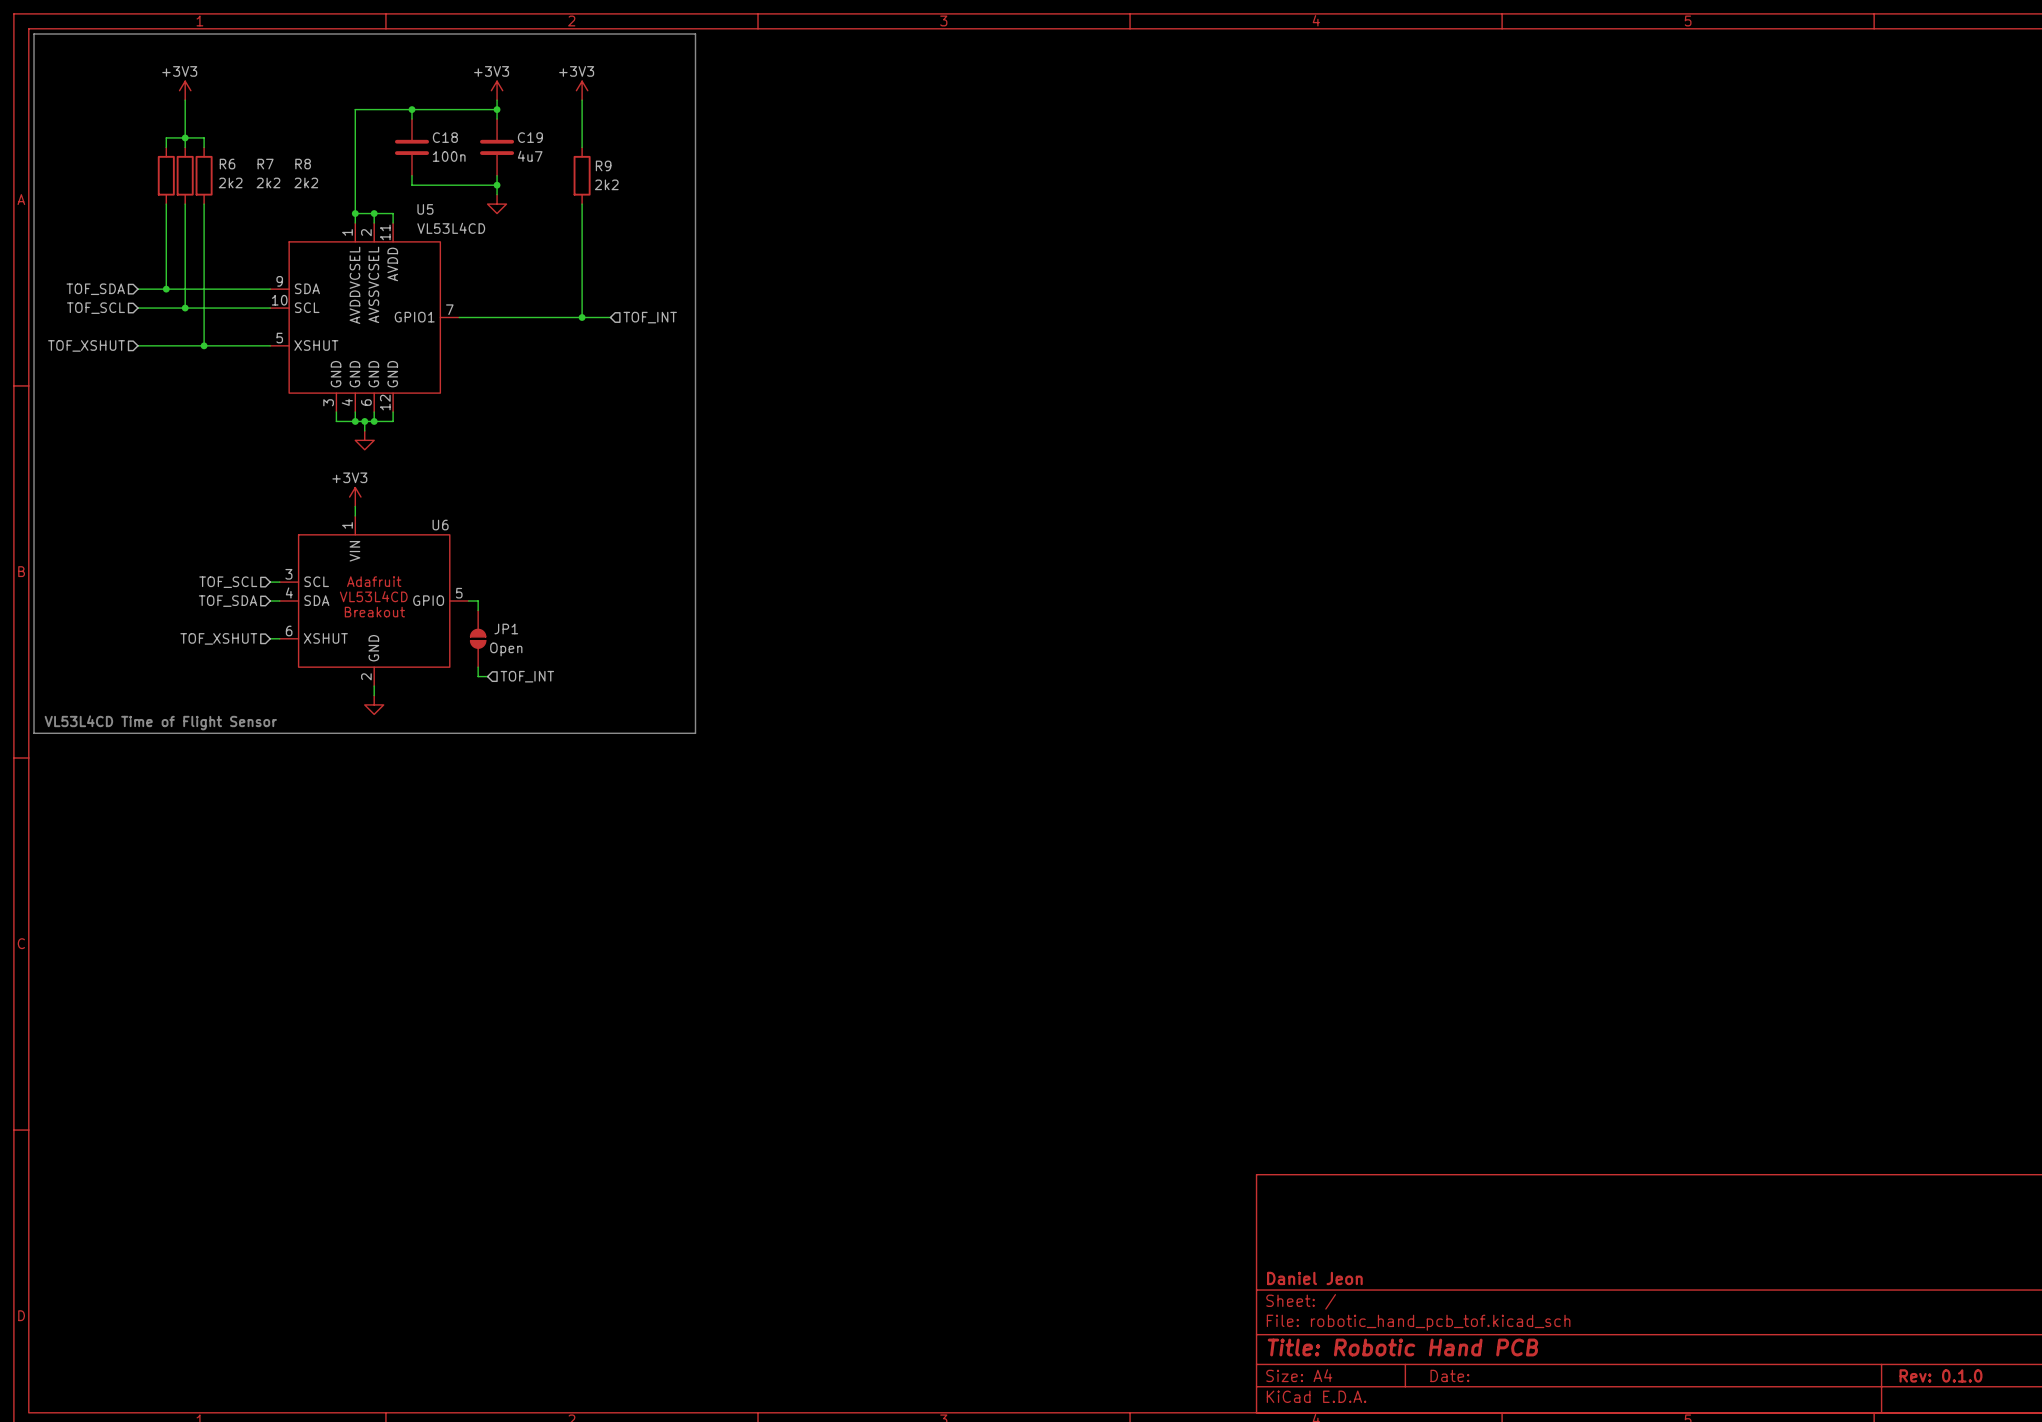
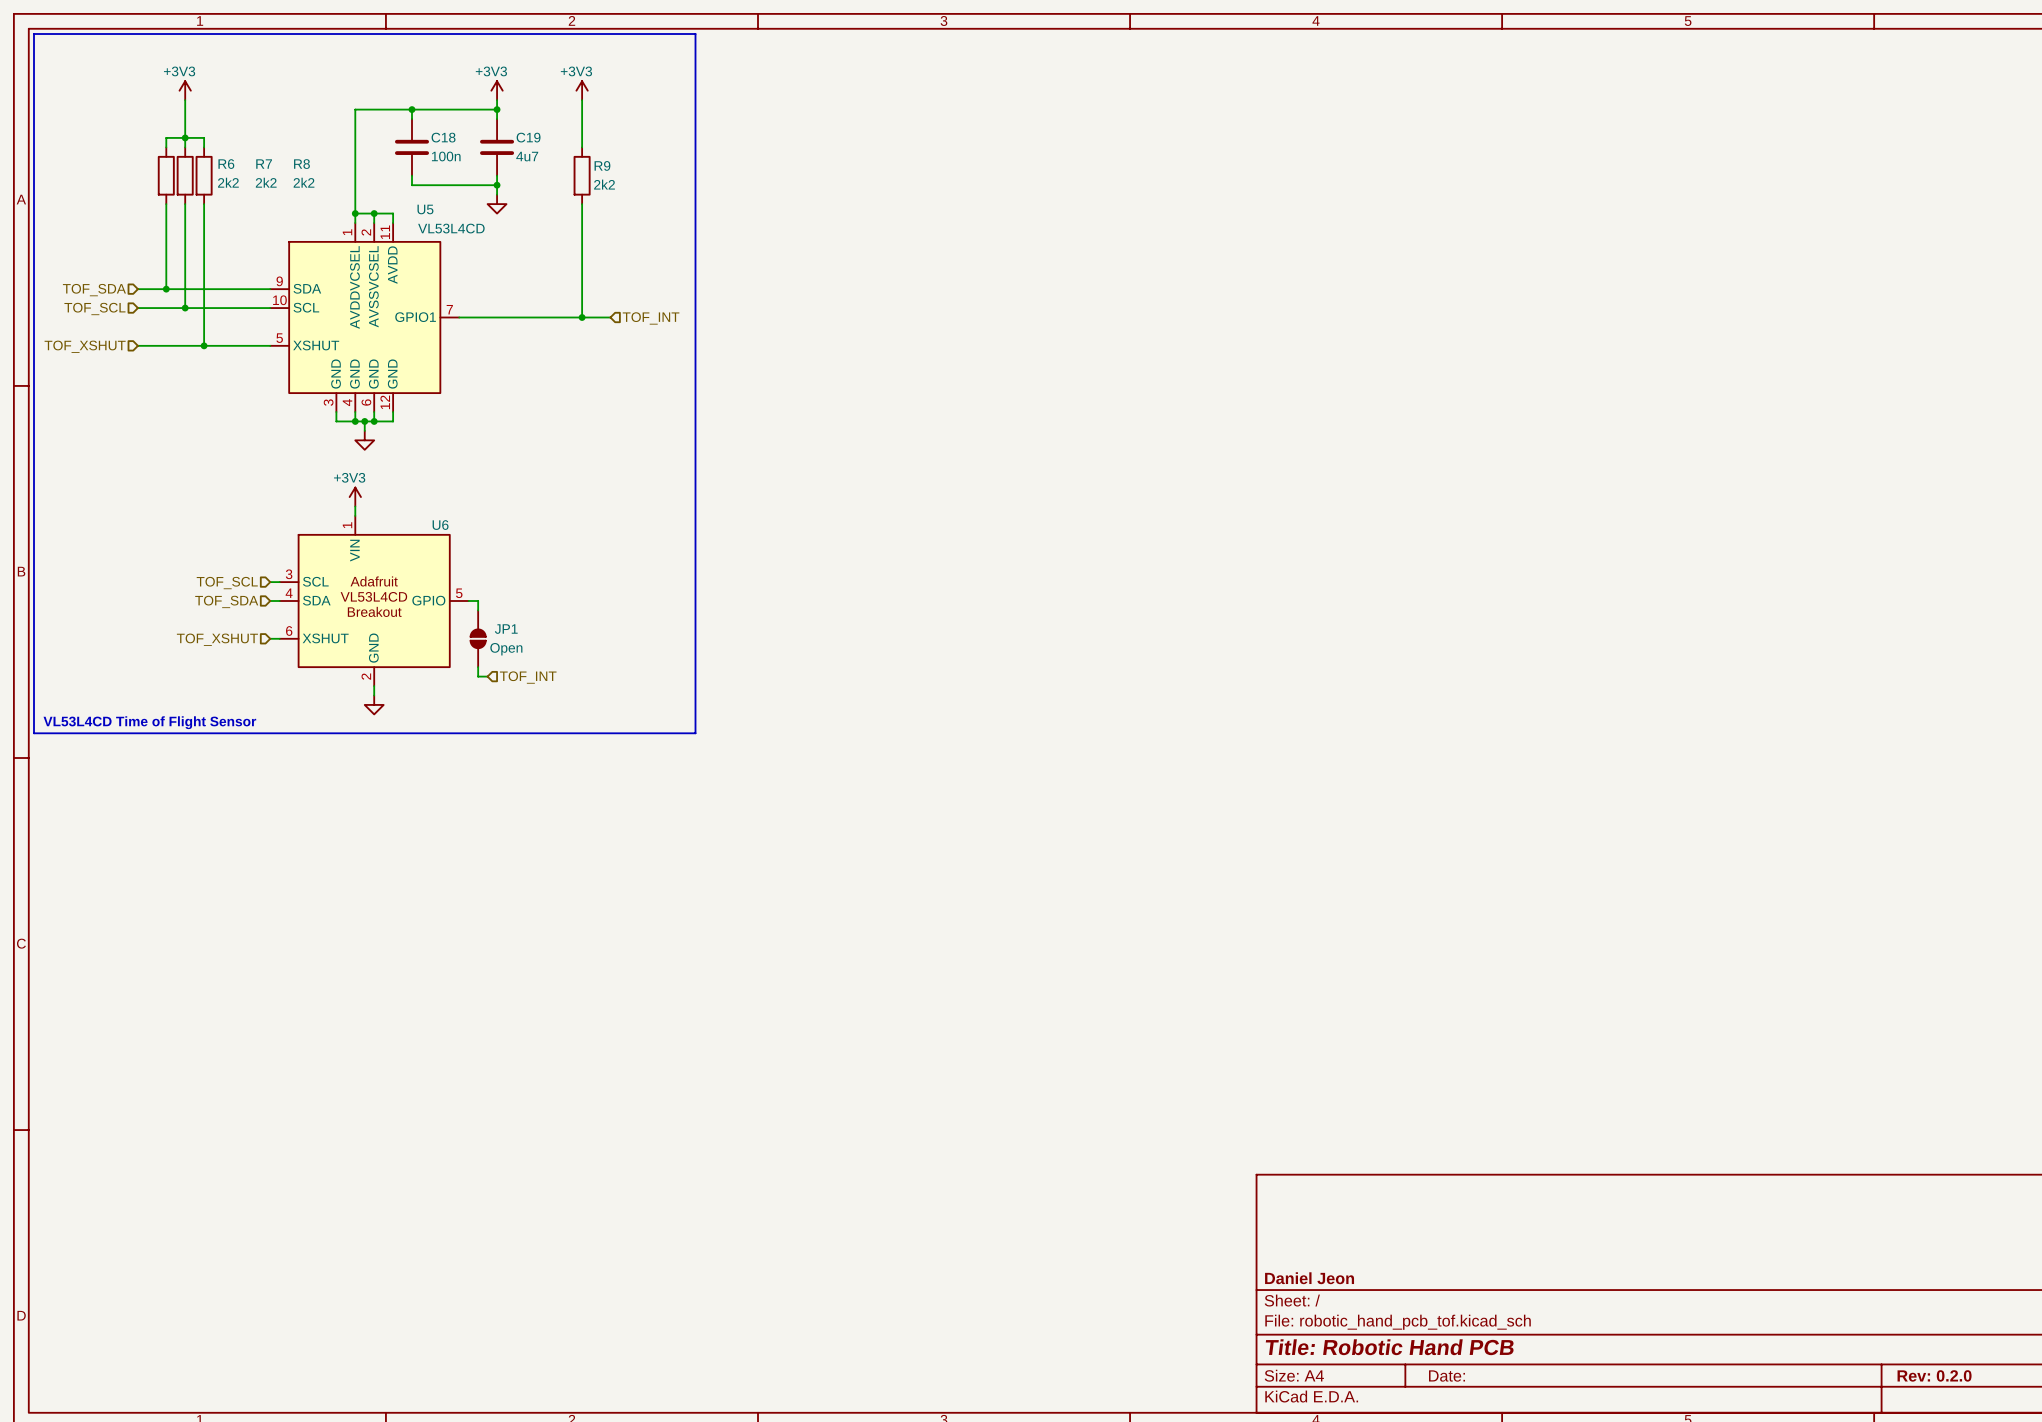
title block: Rev: 0.1.0 (1940, 1375) -> Rev: 0.2.0 (1934, 1375)

